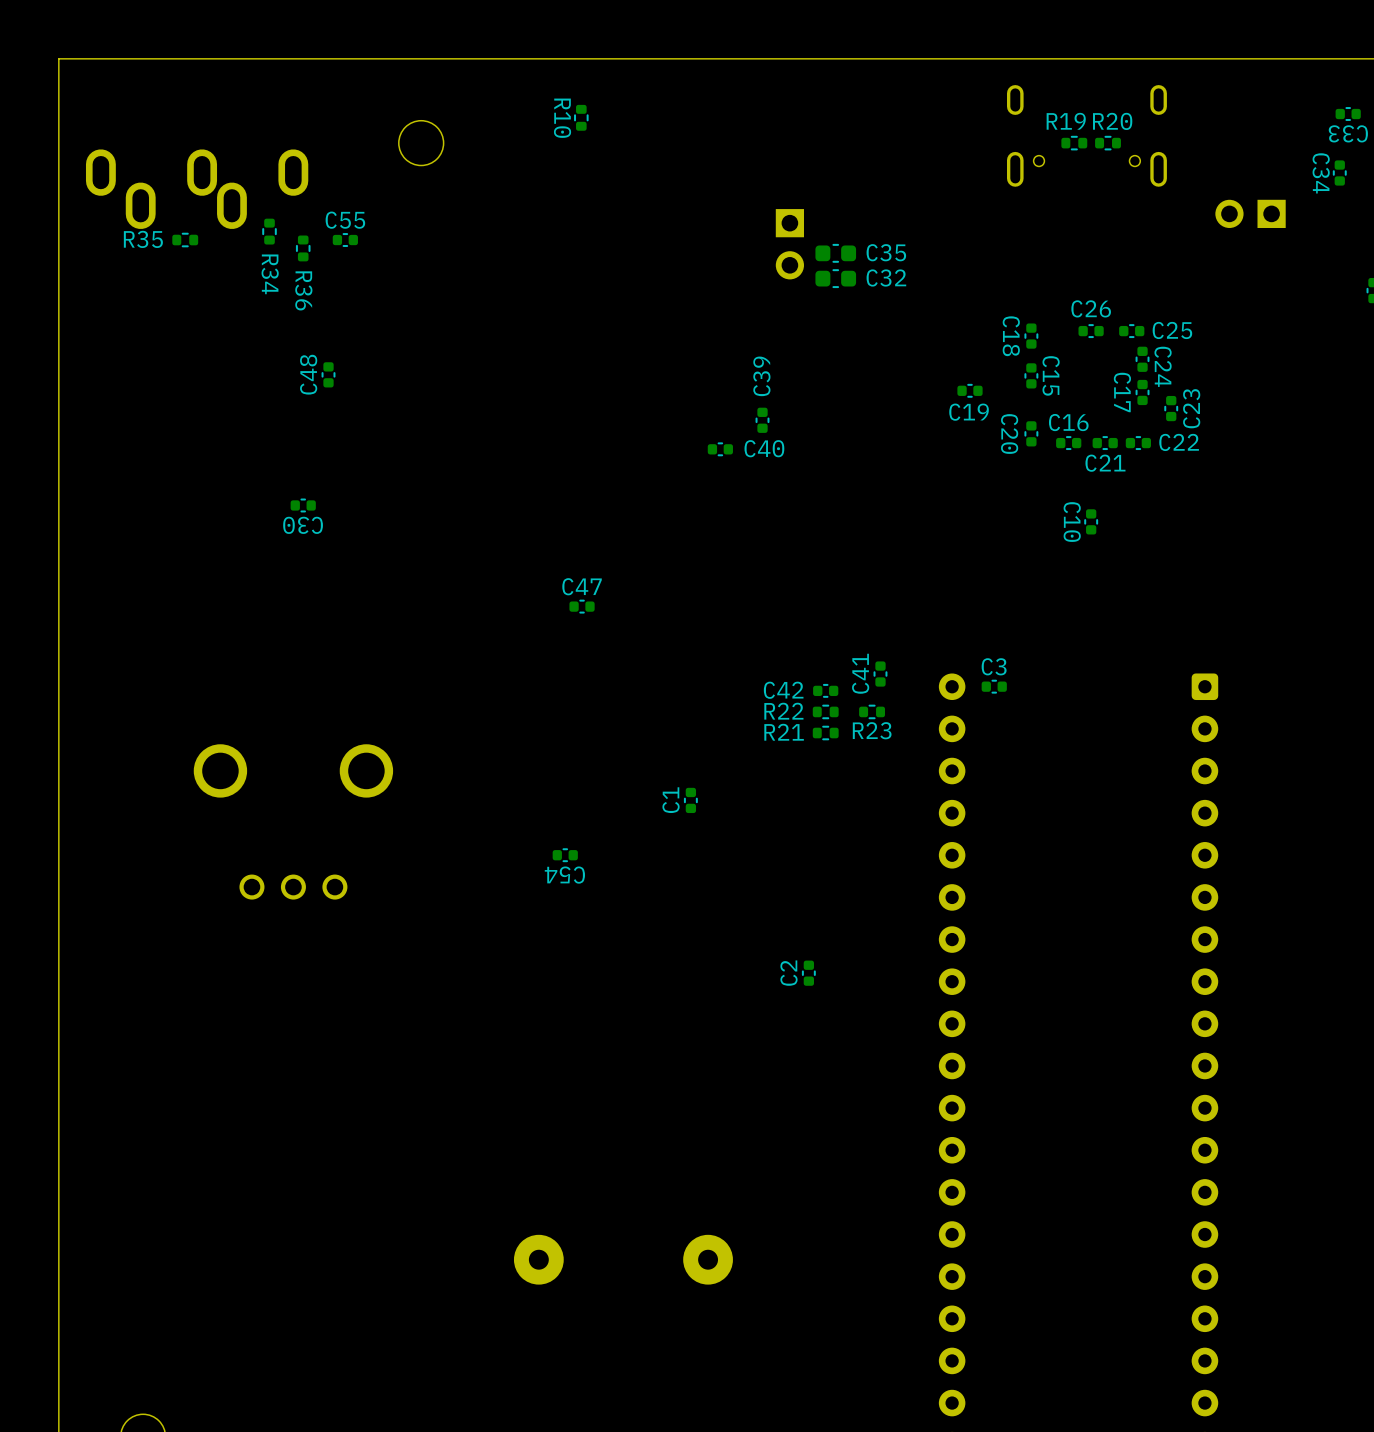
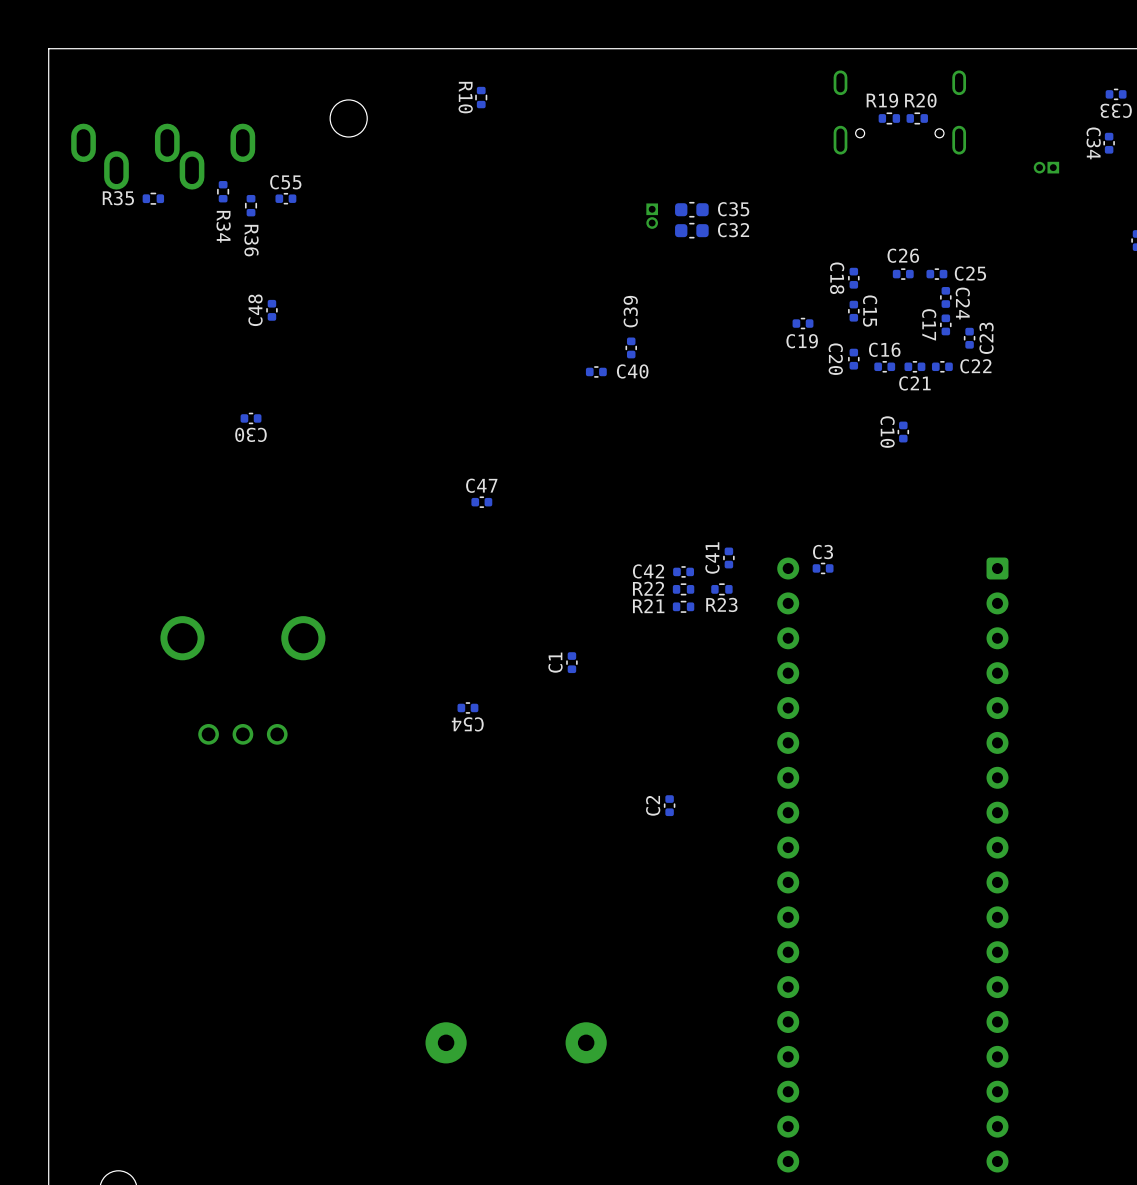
part: none -> (1046, 167)
part: (1250, 213) -> none
part: (789, 244) -> none
part: none -> (652, 216)

